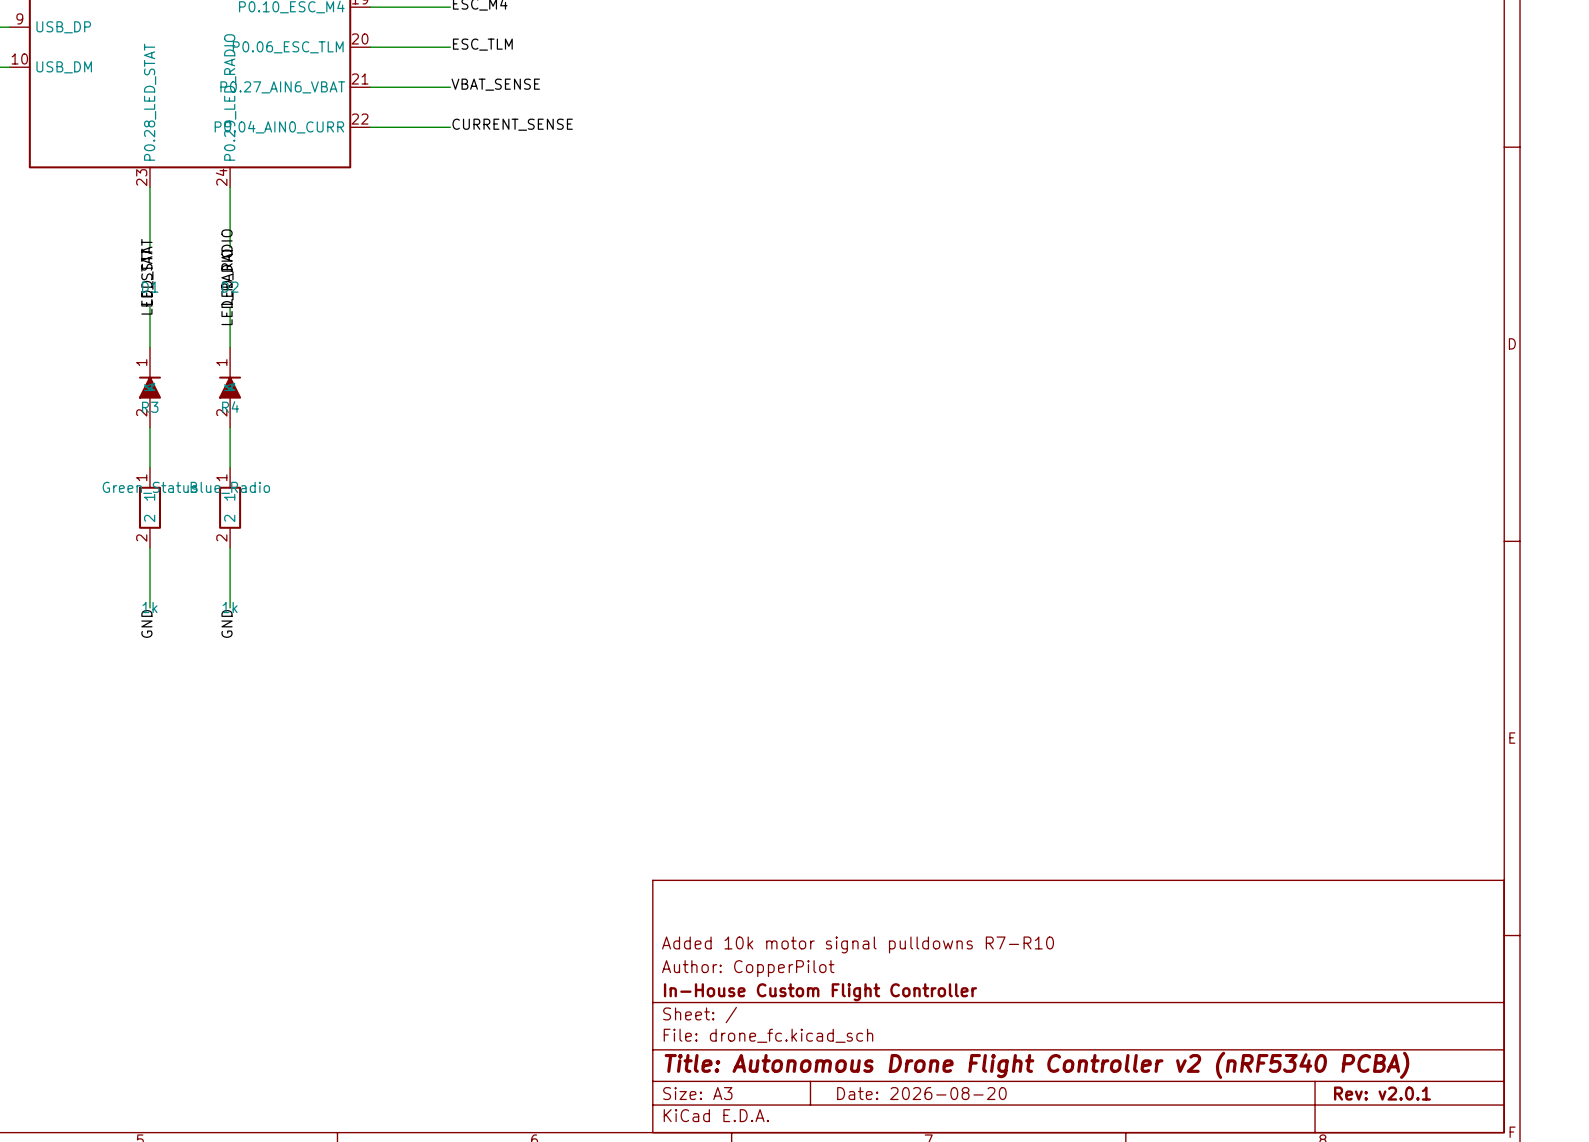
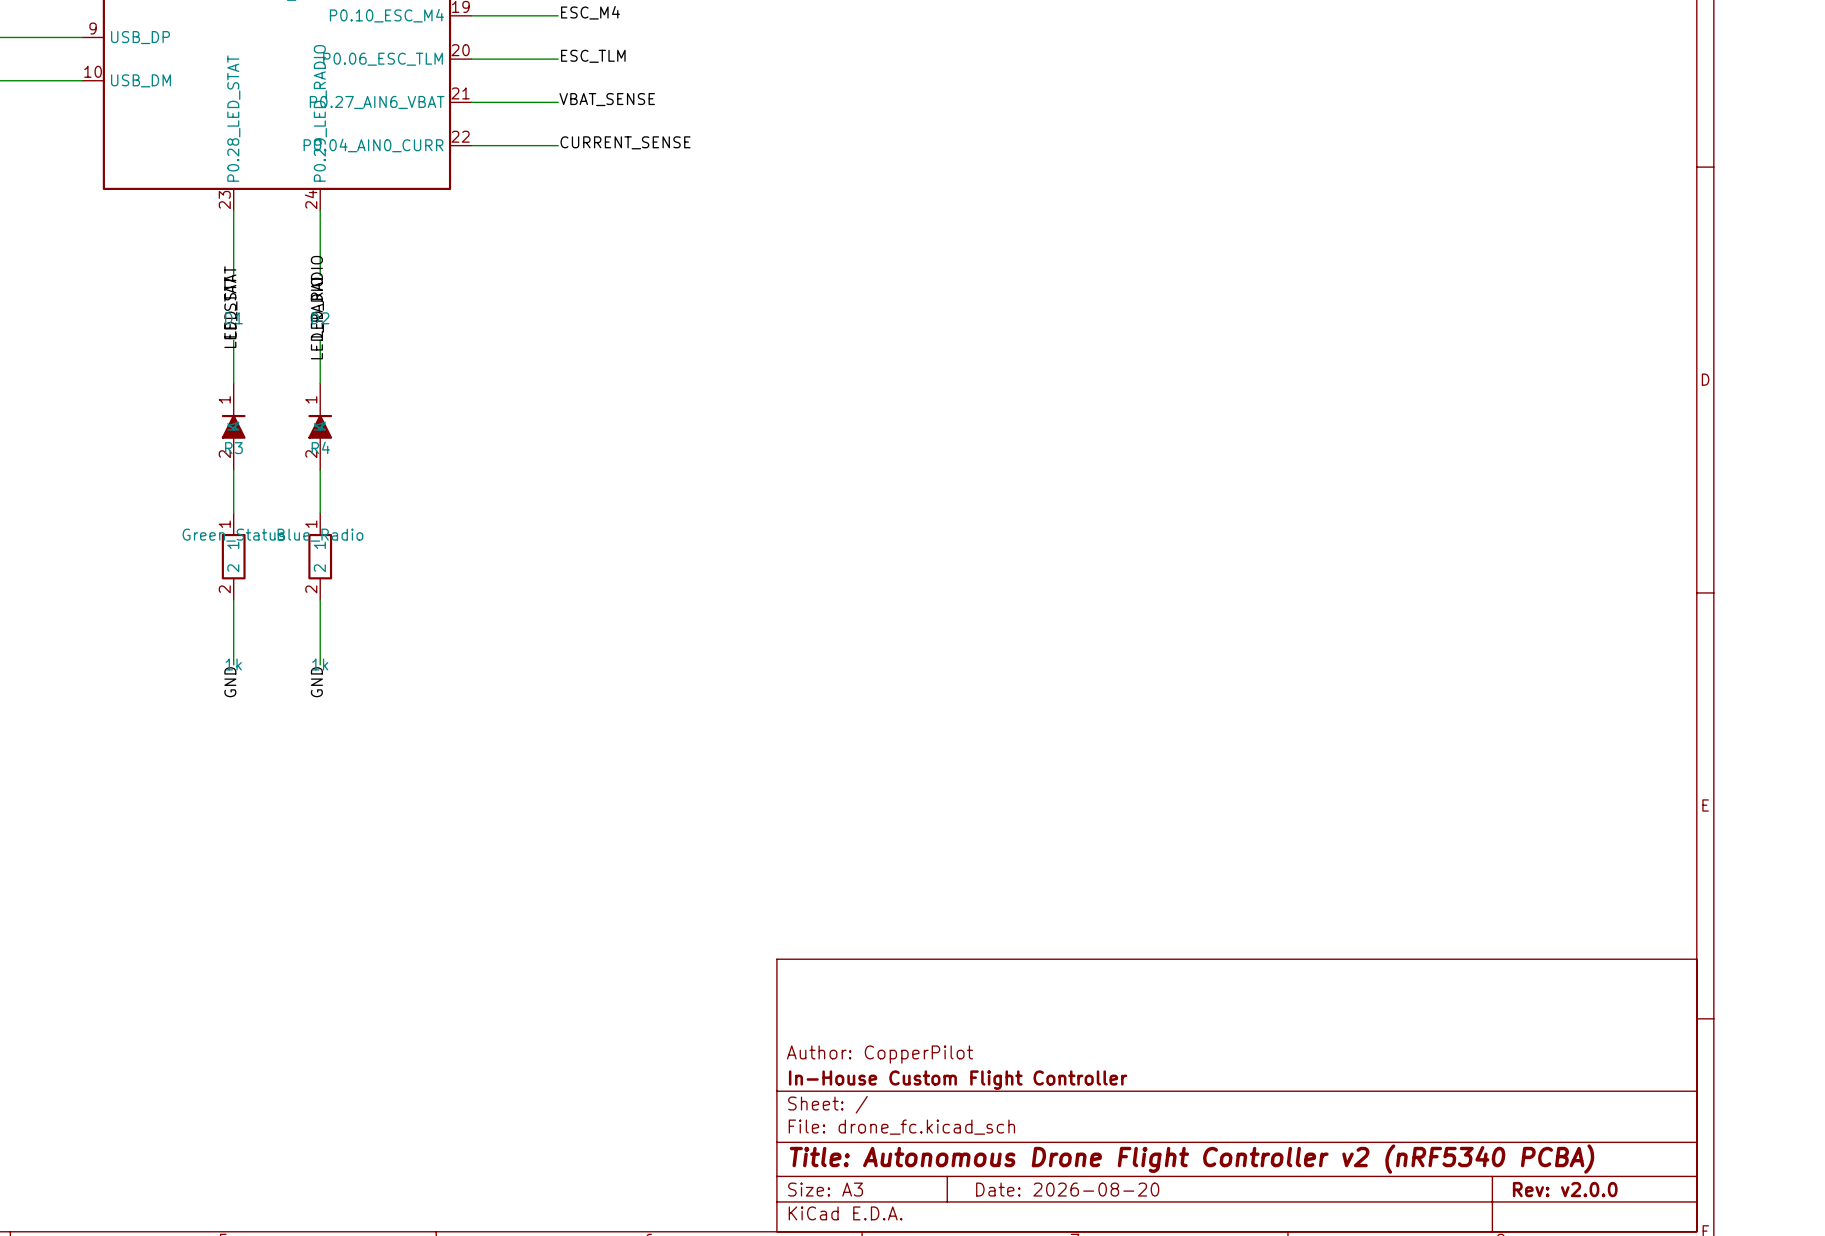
title block: Added 10k motor signal pulldowns R7-R10 (858, 944) -> none
title block: Rev: v2.0.1 (1382, 1093) -> Rev: v2.0.0 (1565, 1189)

